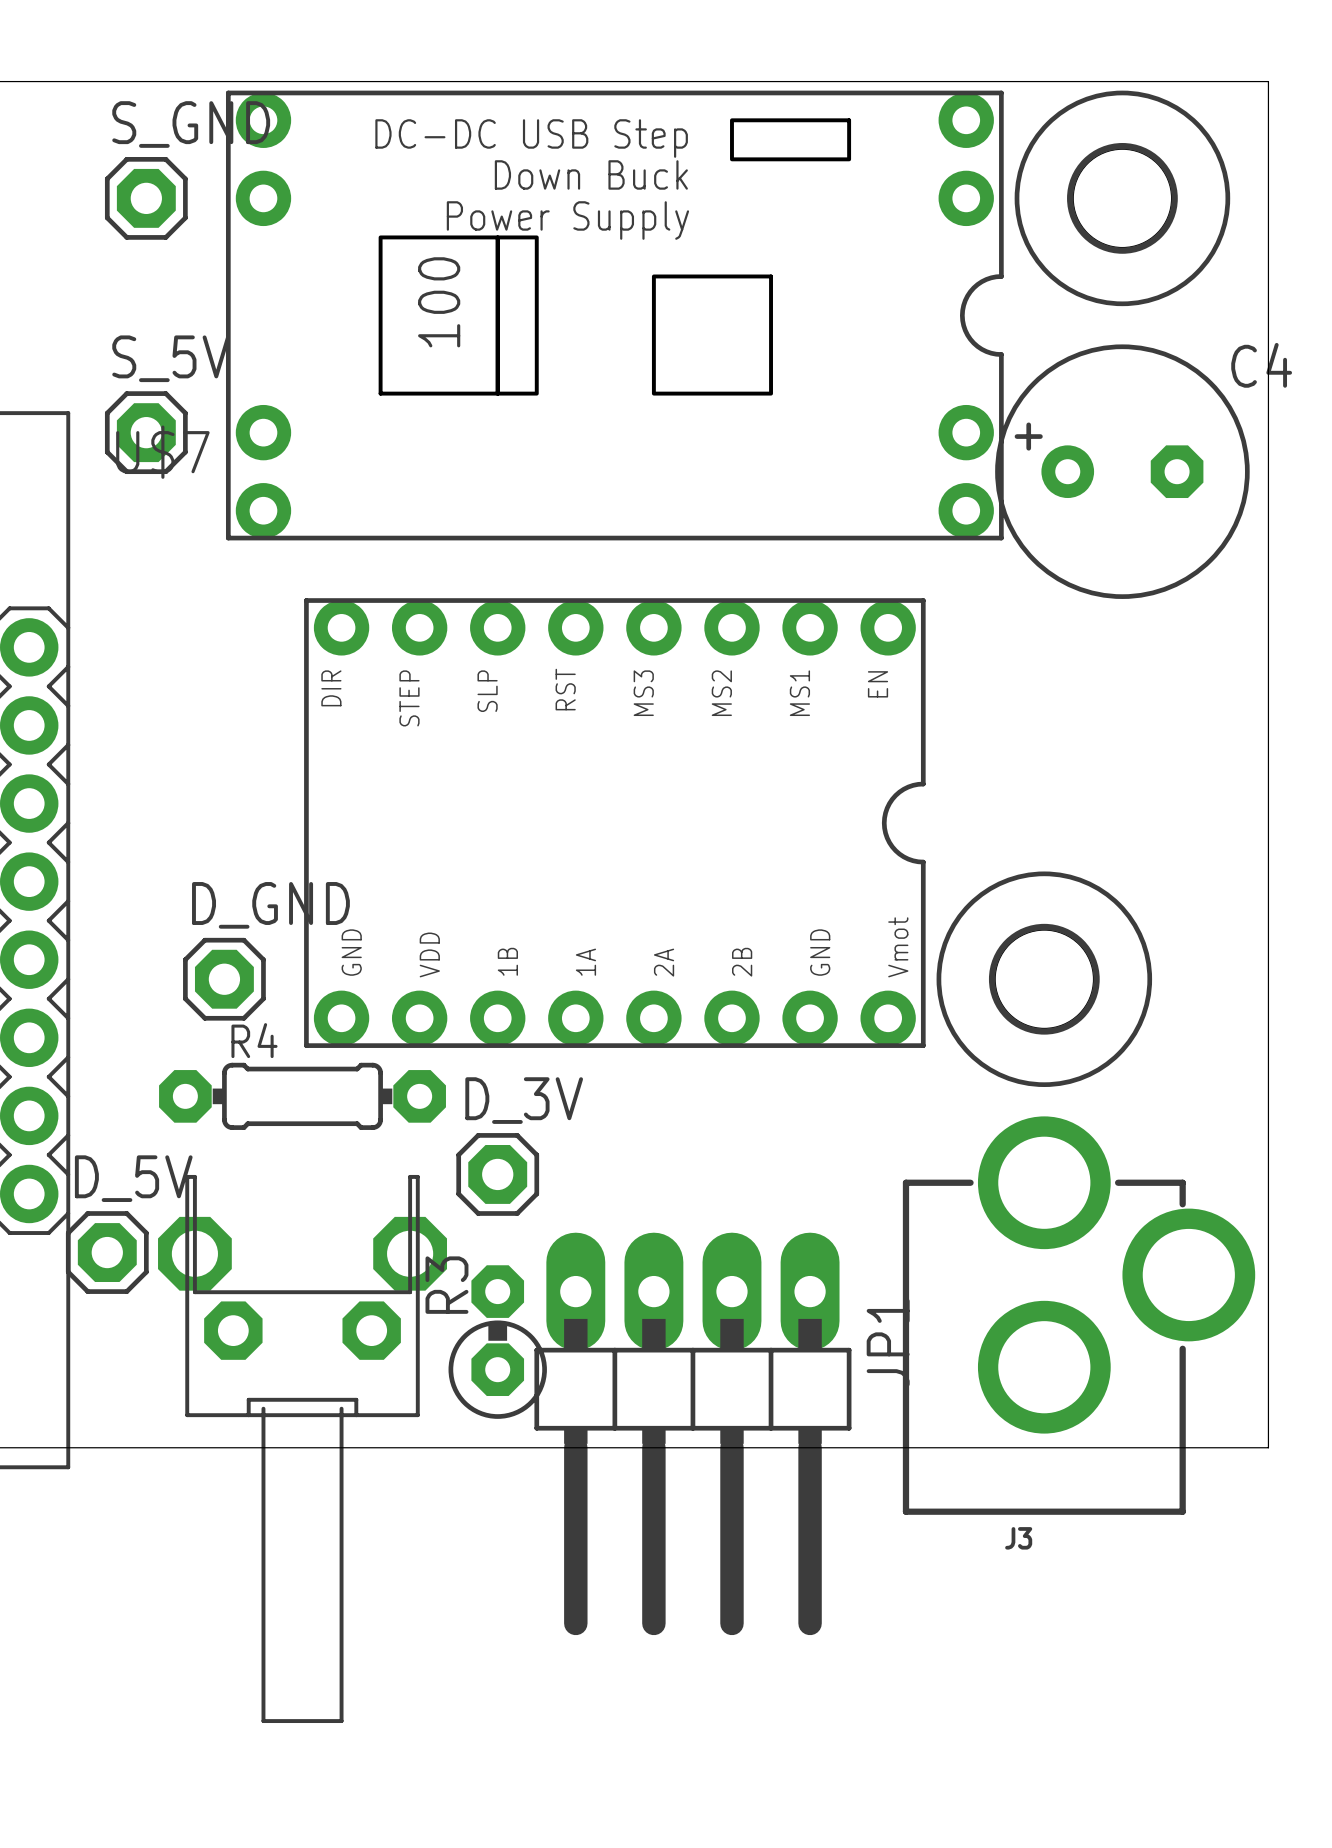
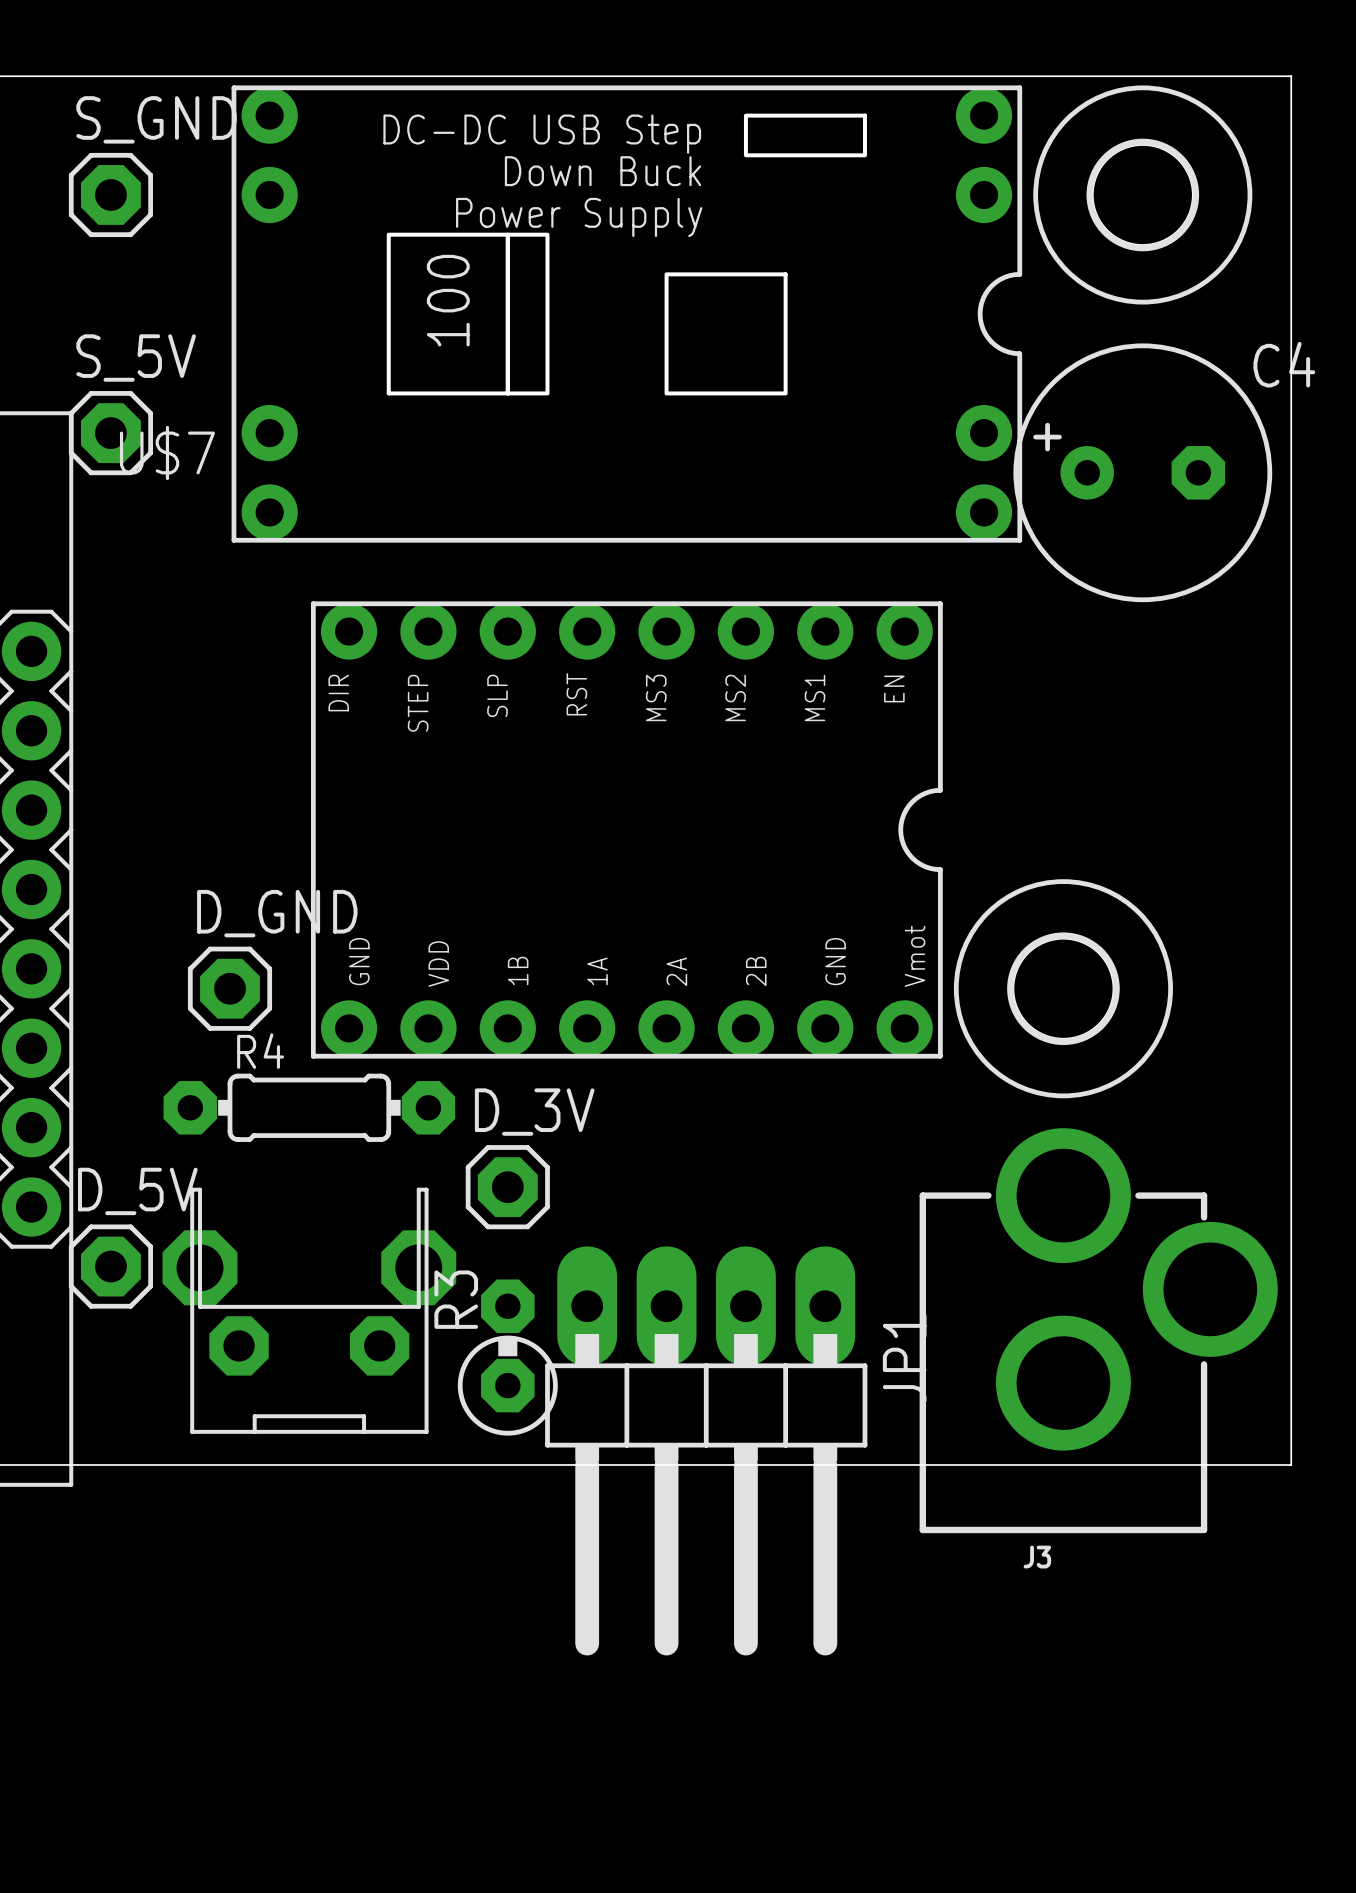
S_GND position: (146, 198) -> (110, 194)
S_5V position: (146, 432) -> (110, 433)
part: none -> (309, 1310)
part: (302, 1448) -> none

